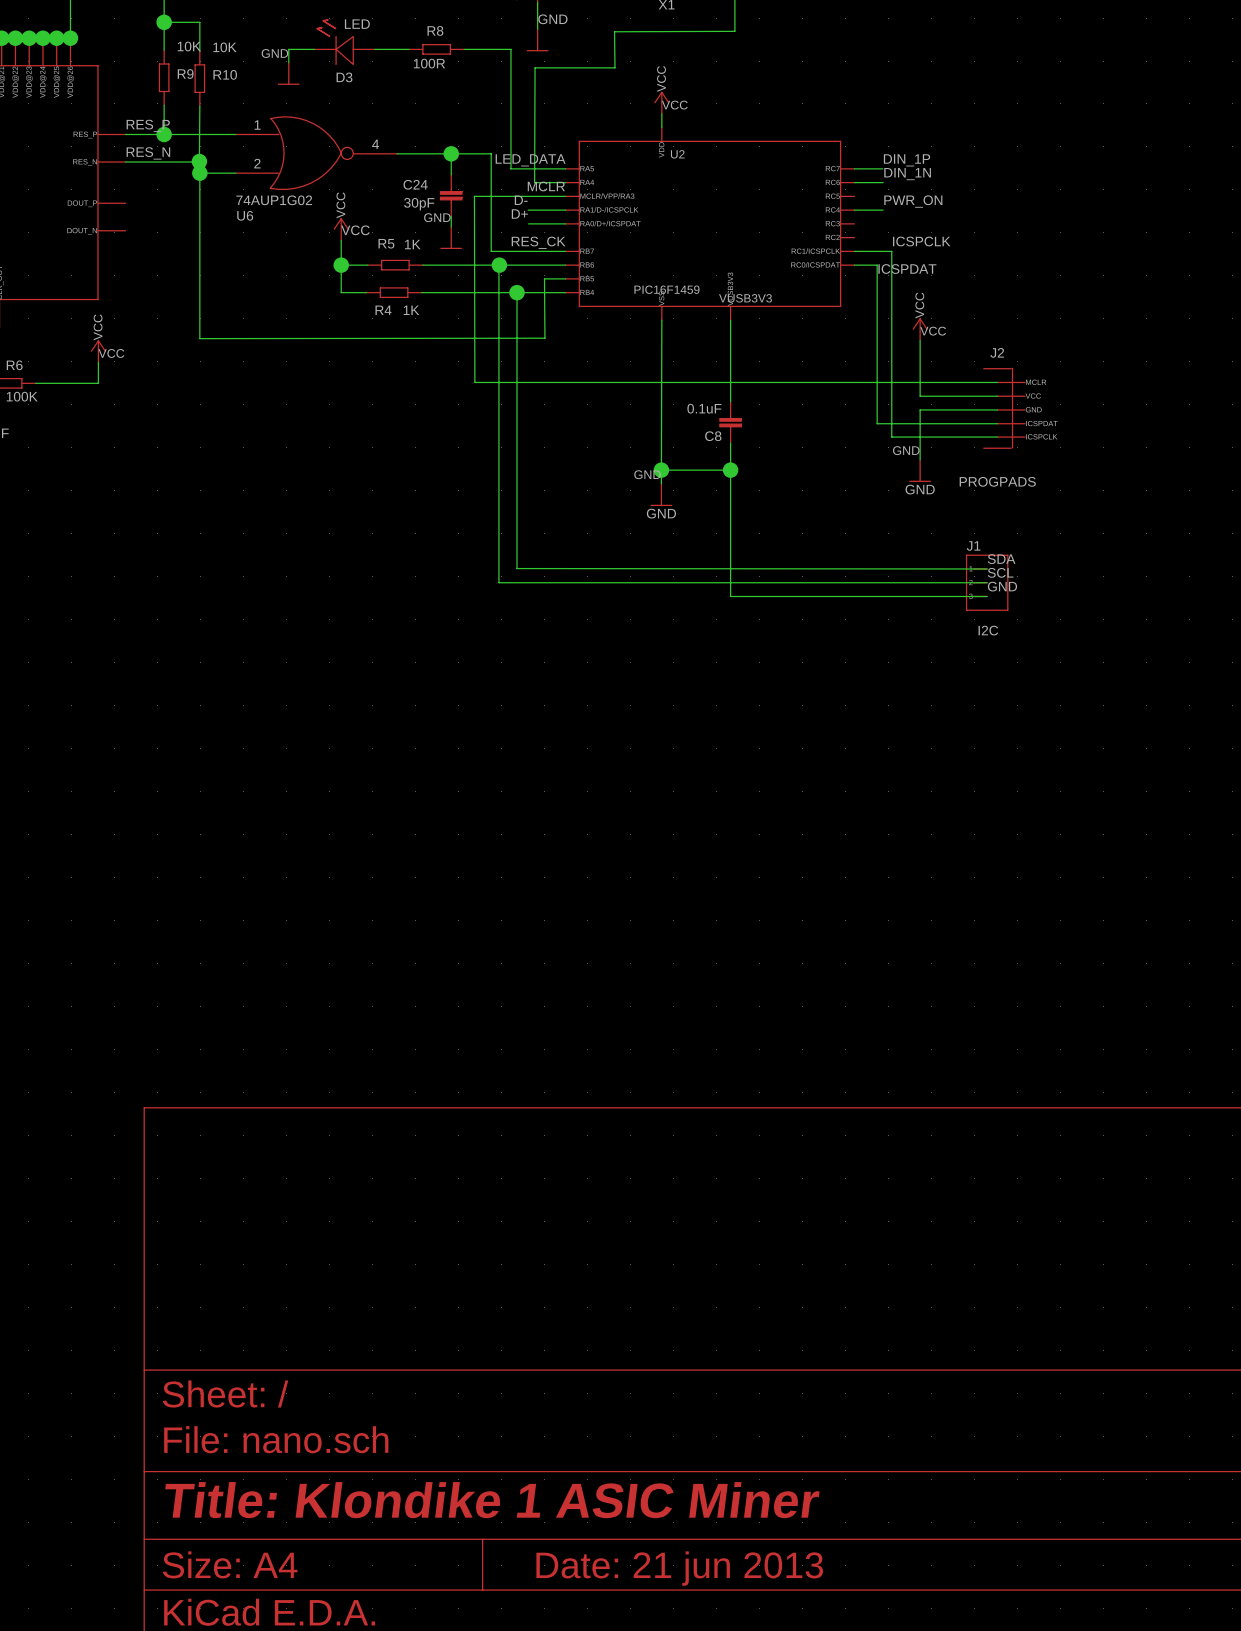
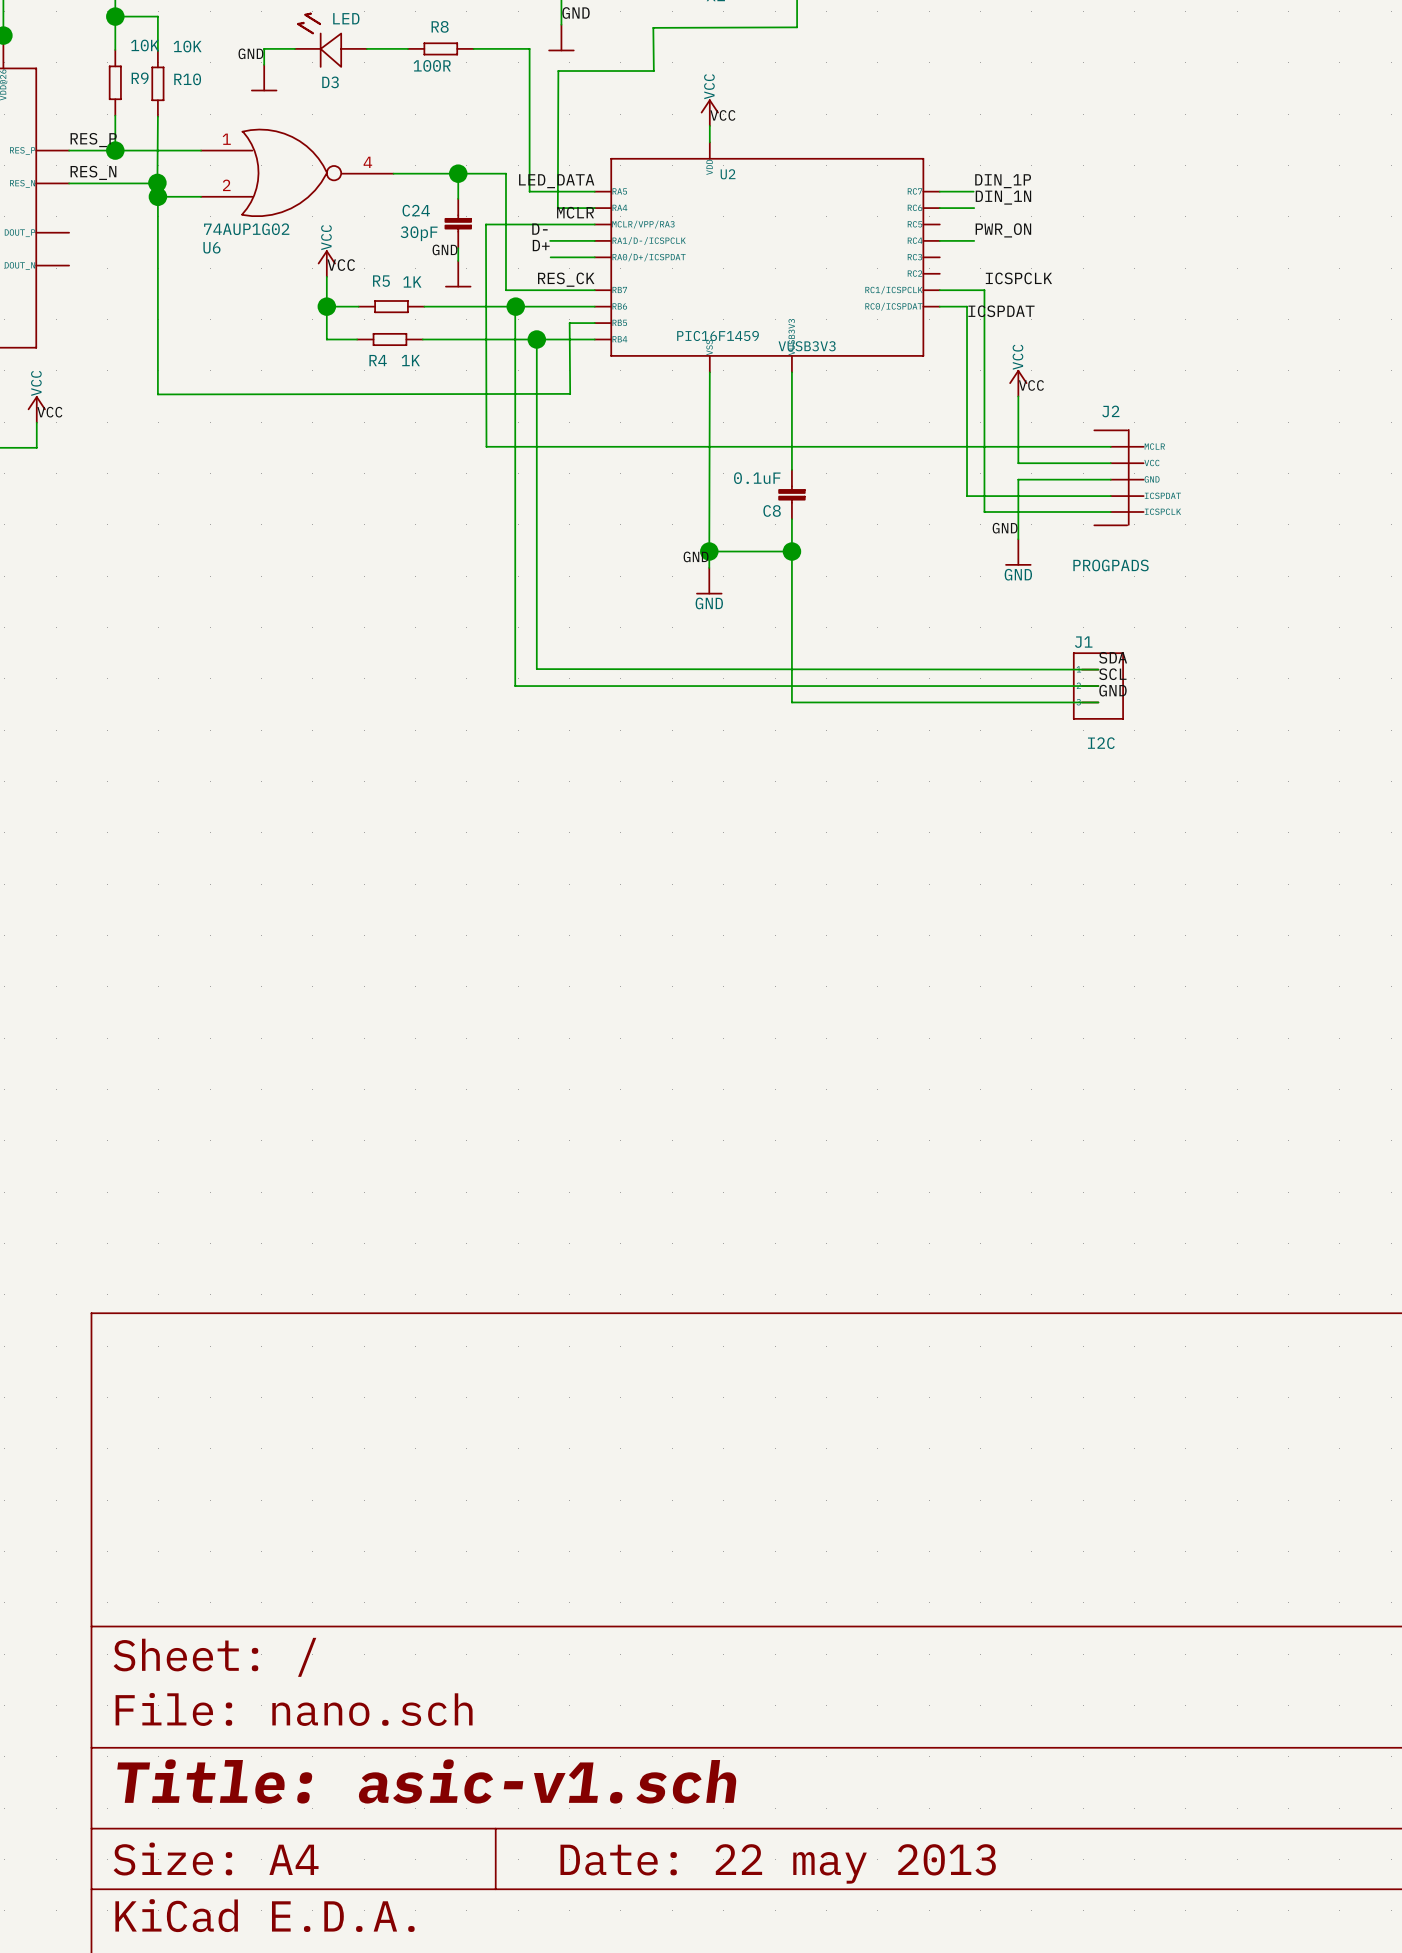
title block: Title: Klondike 1 ASIC Miner (492, 1500) -> Title: asic-v1.sch (426, 1781)
title block: Date: 21 jun 2013 (679, 1568) -> Date: 22 may 2013 (778, 1863)

